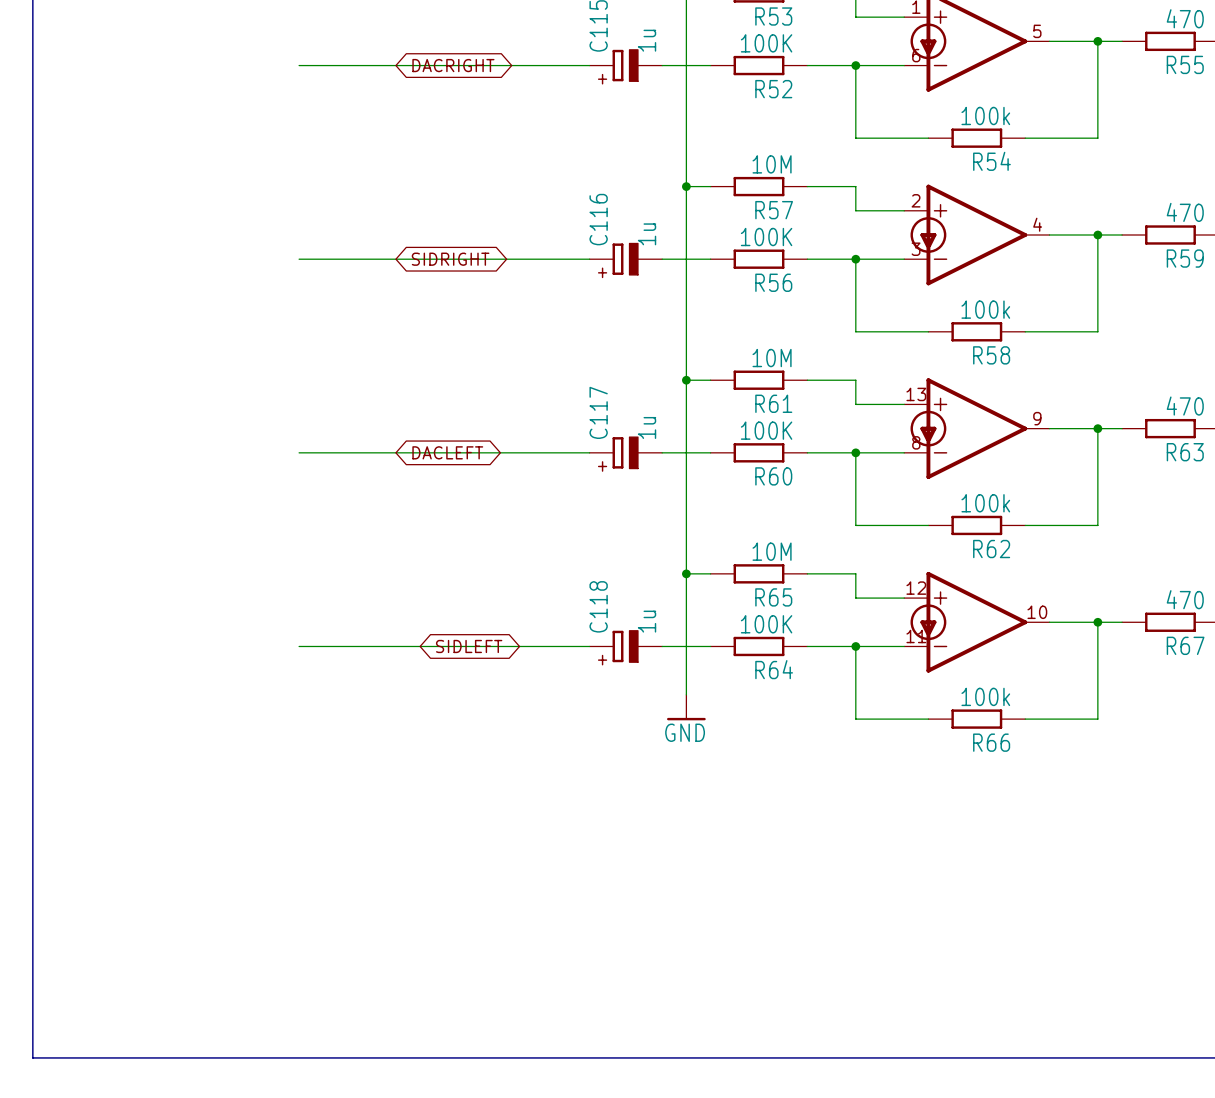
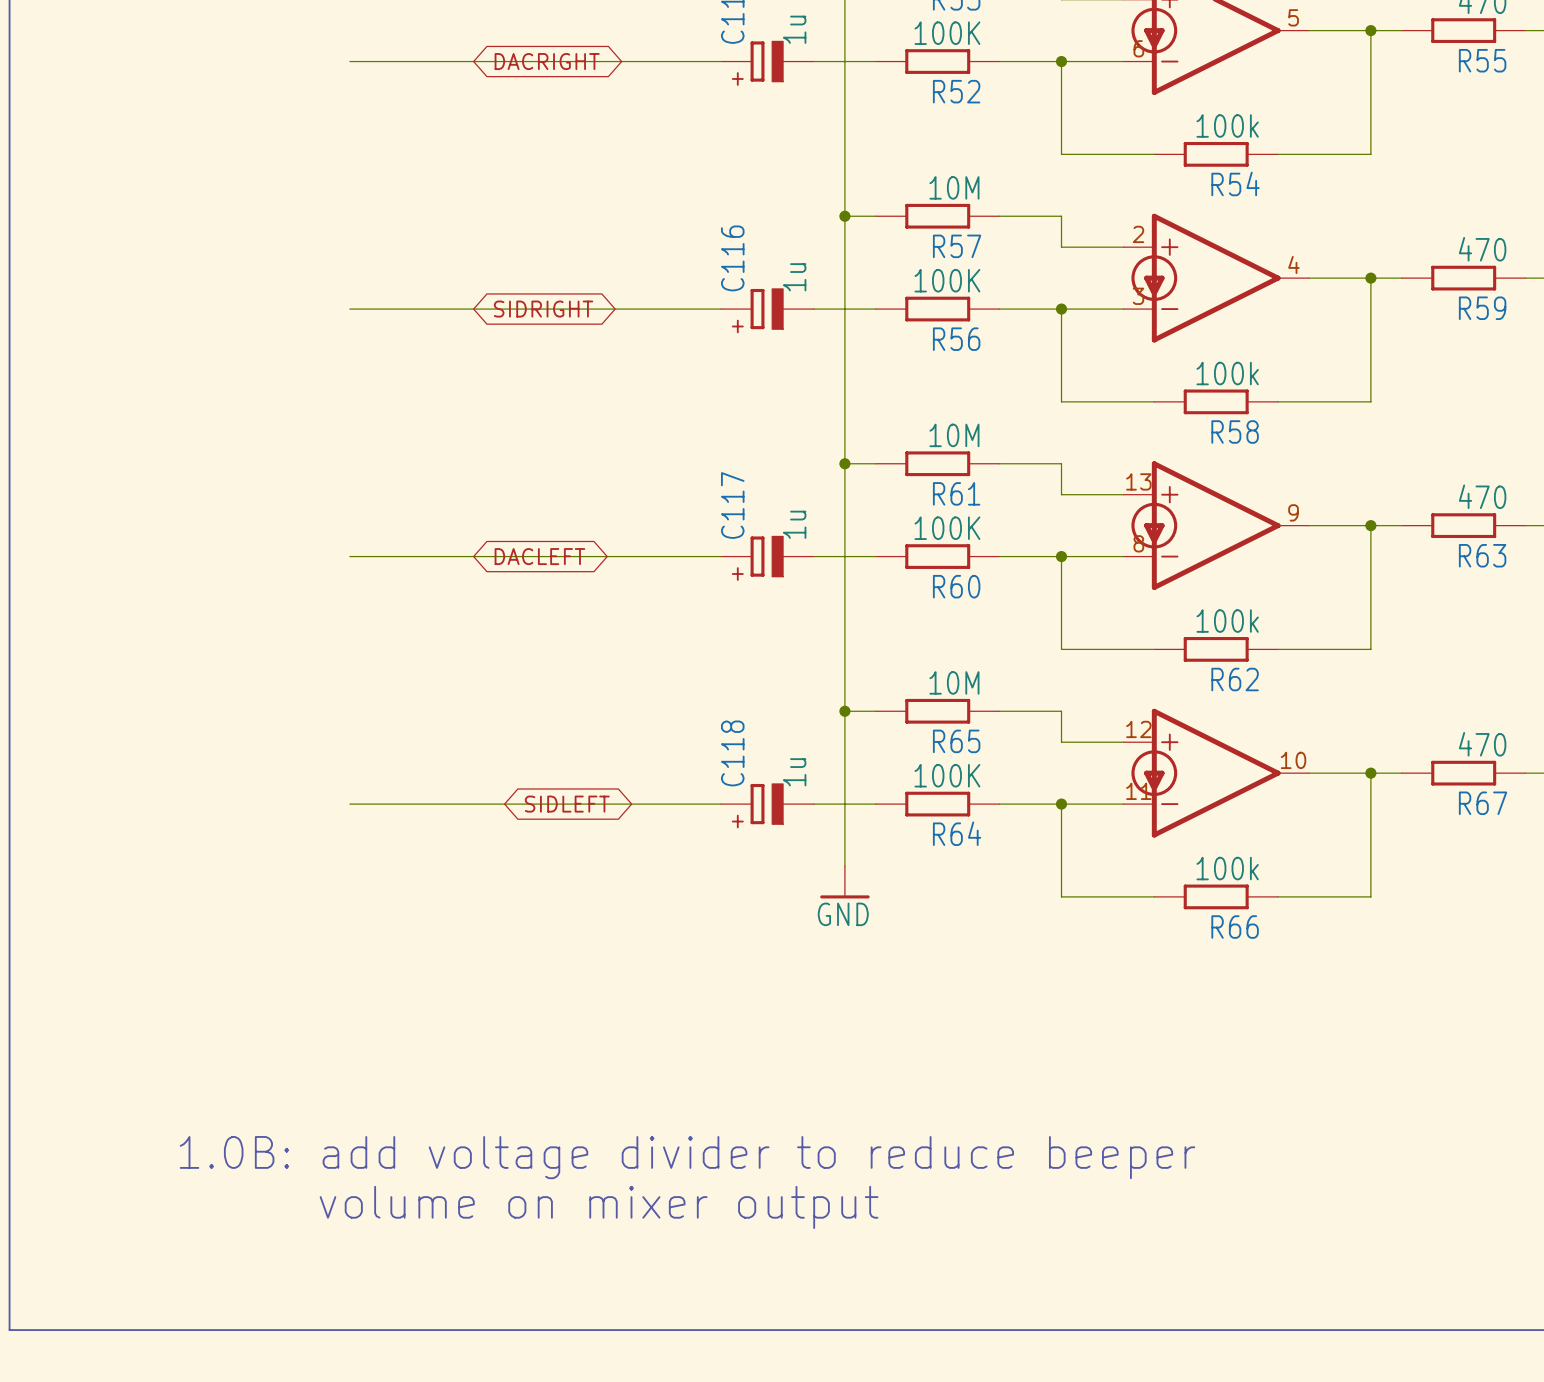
text: none -> 1.0B: add voltage divider to reduce beeper (687, 1157)
text: none -> volume on mixer output (599, 1207)

